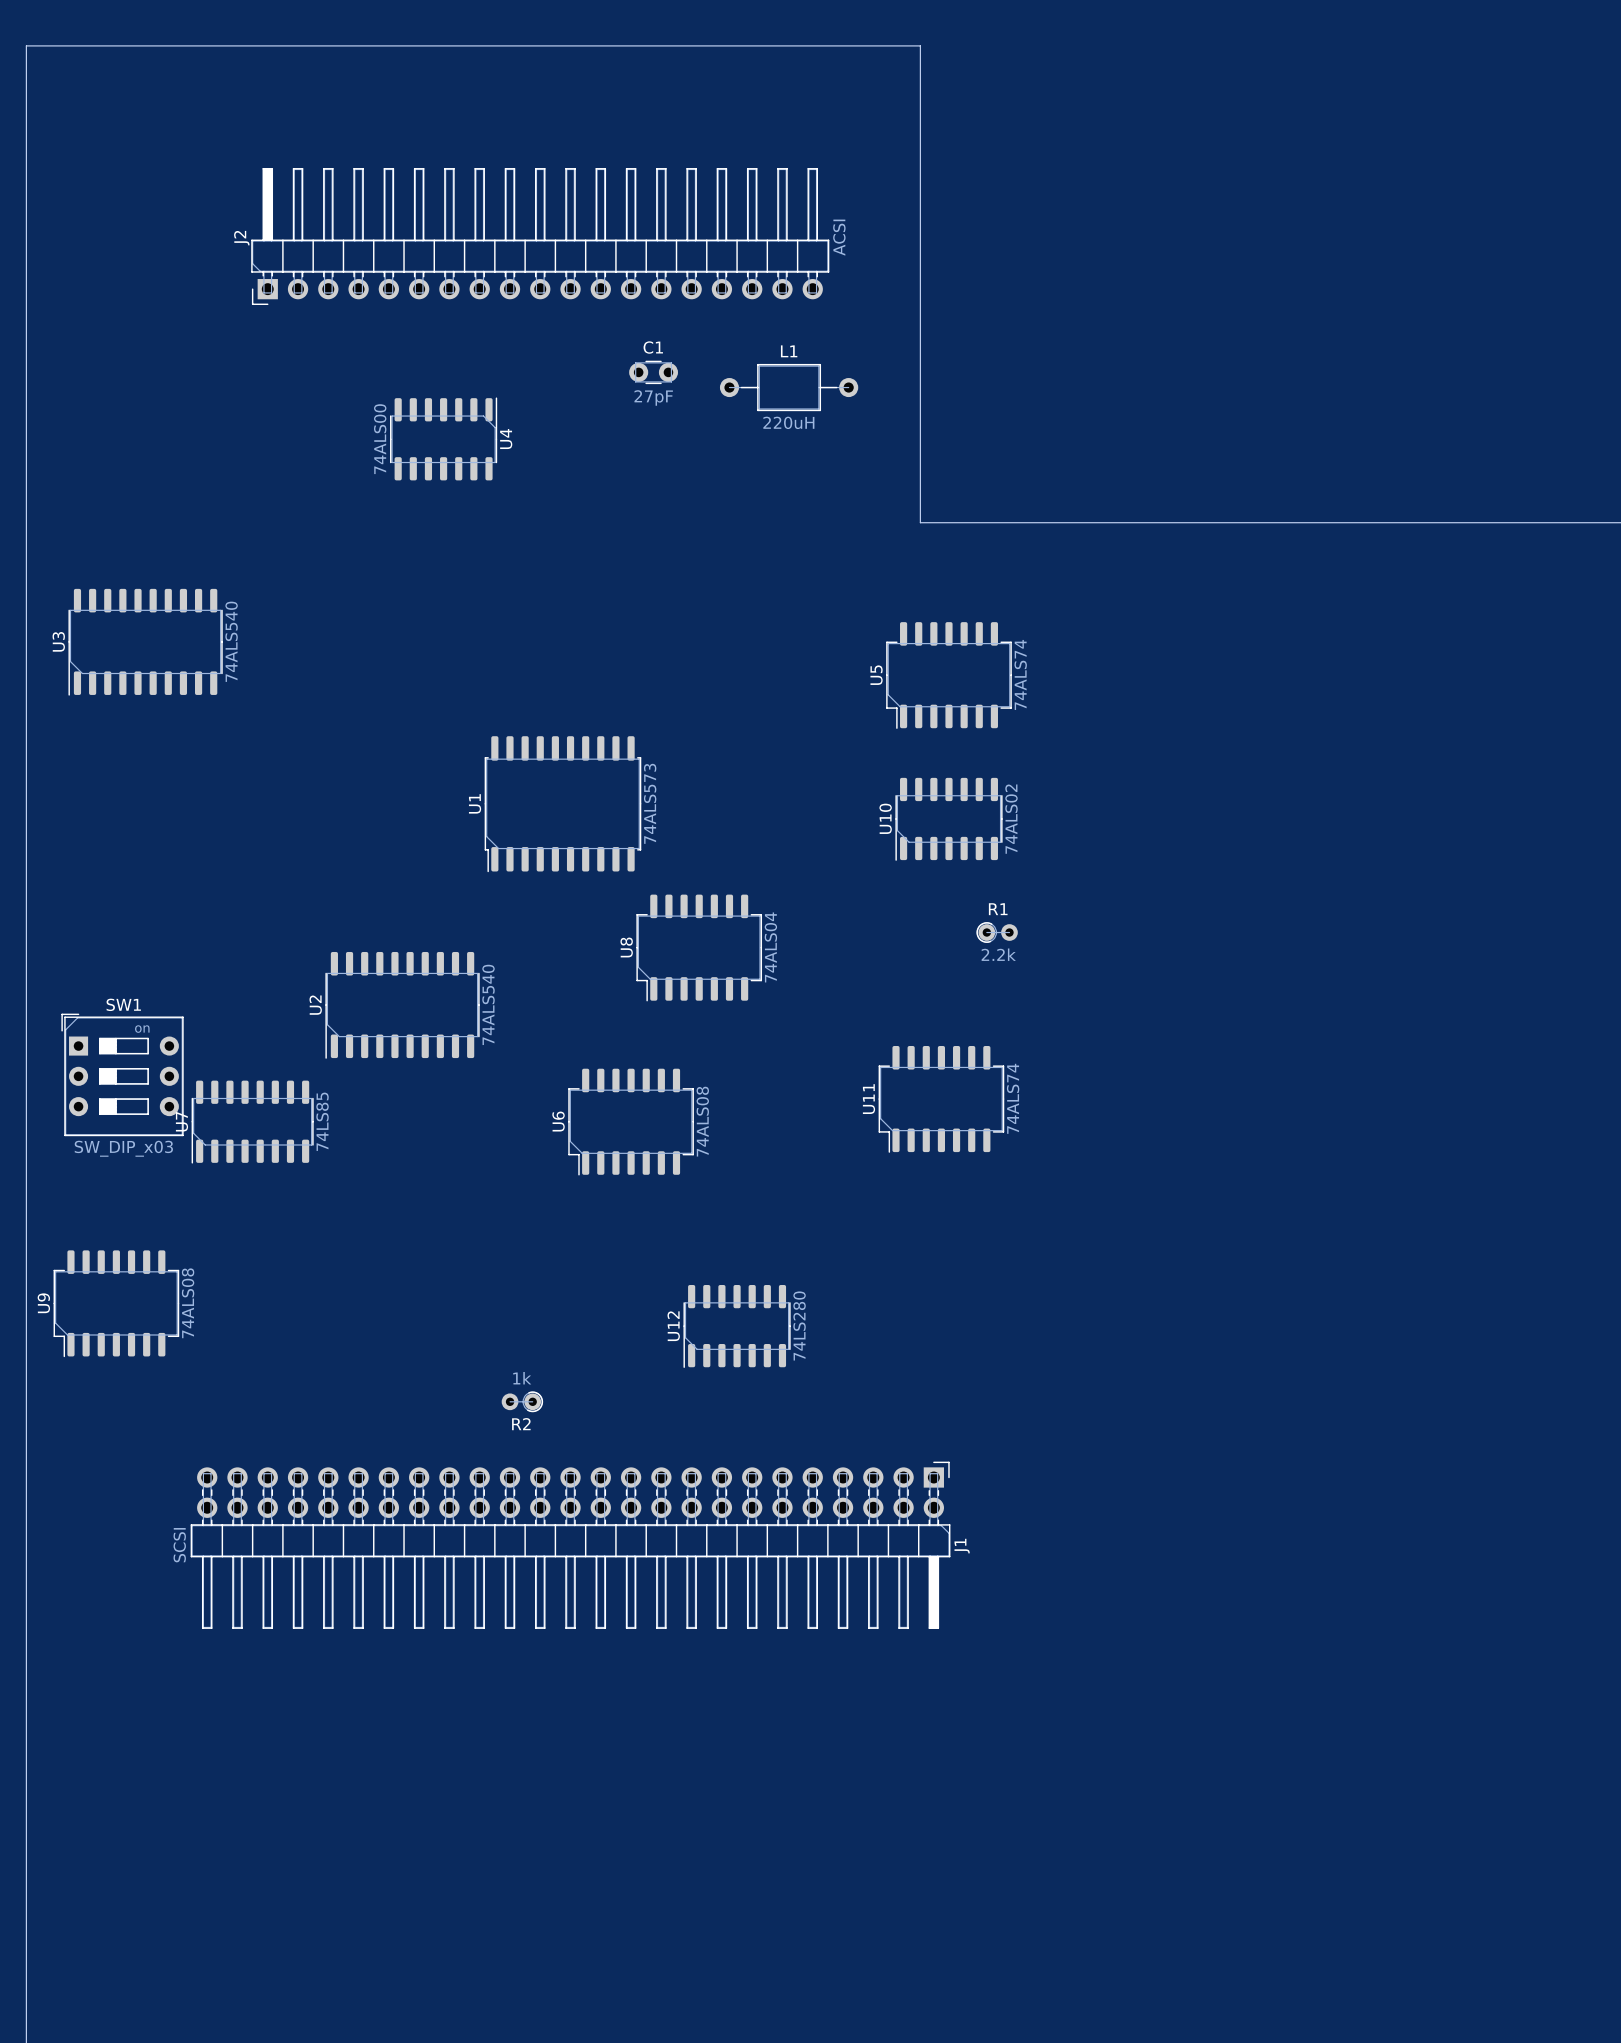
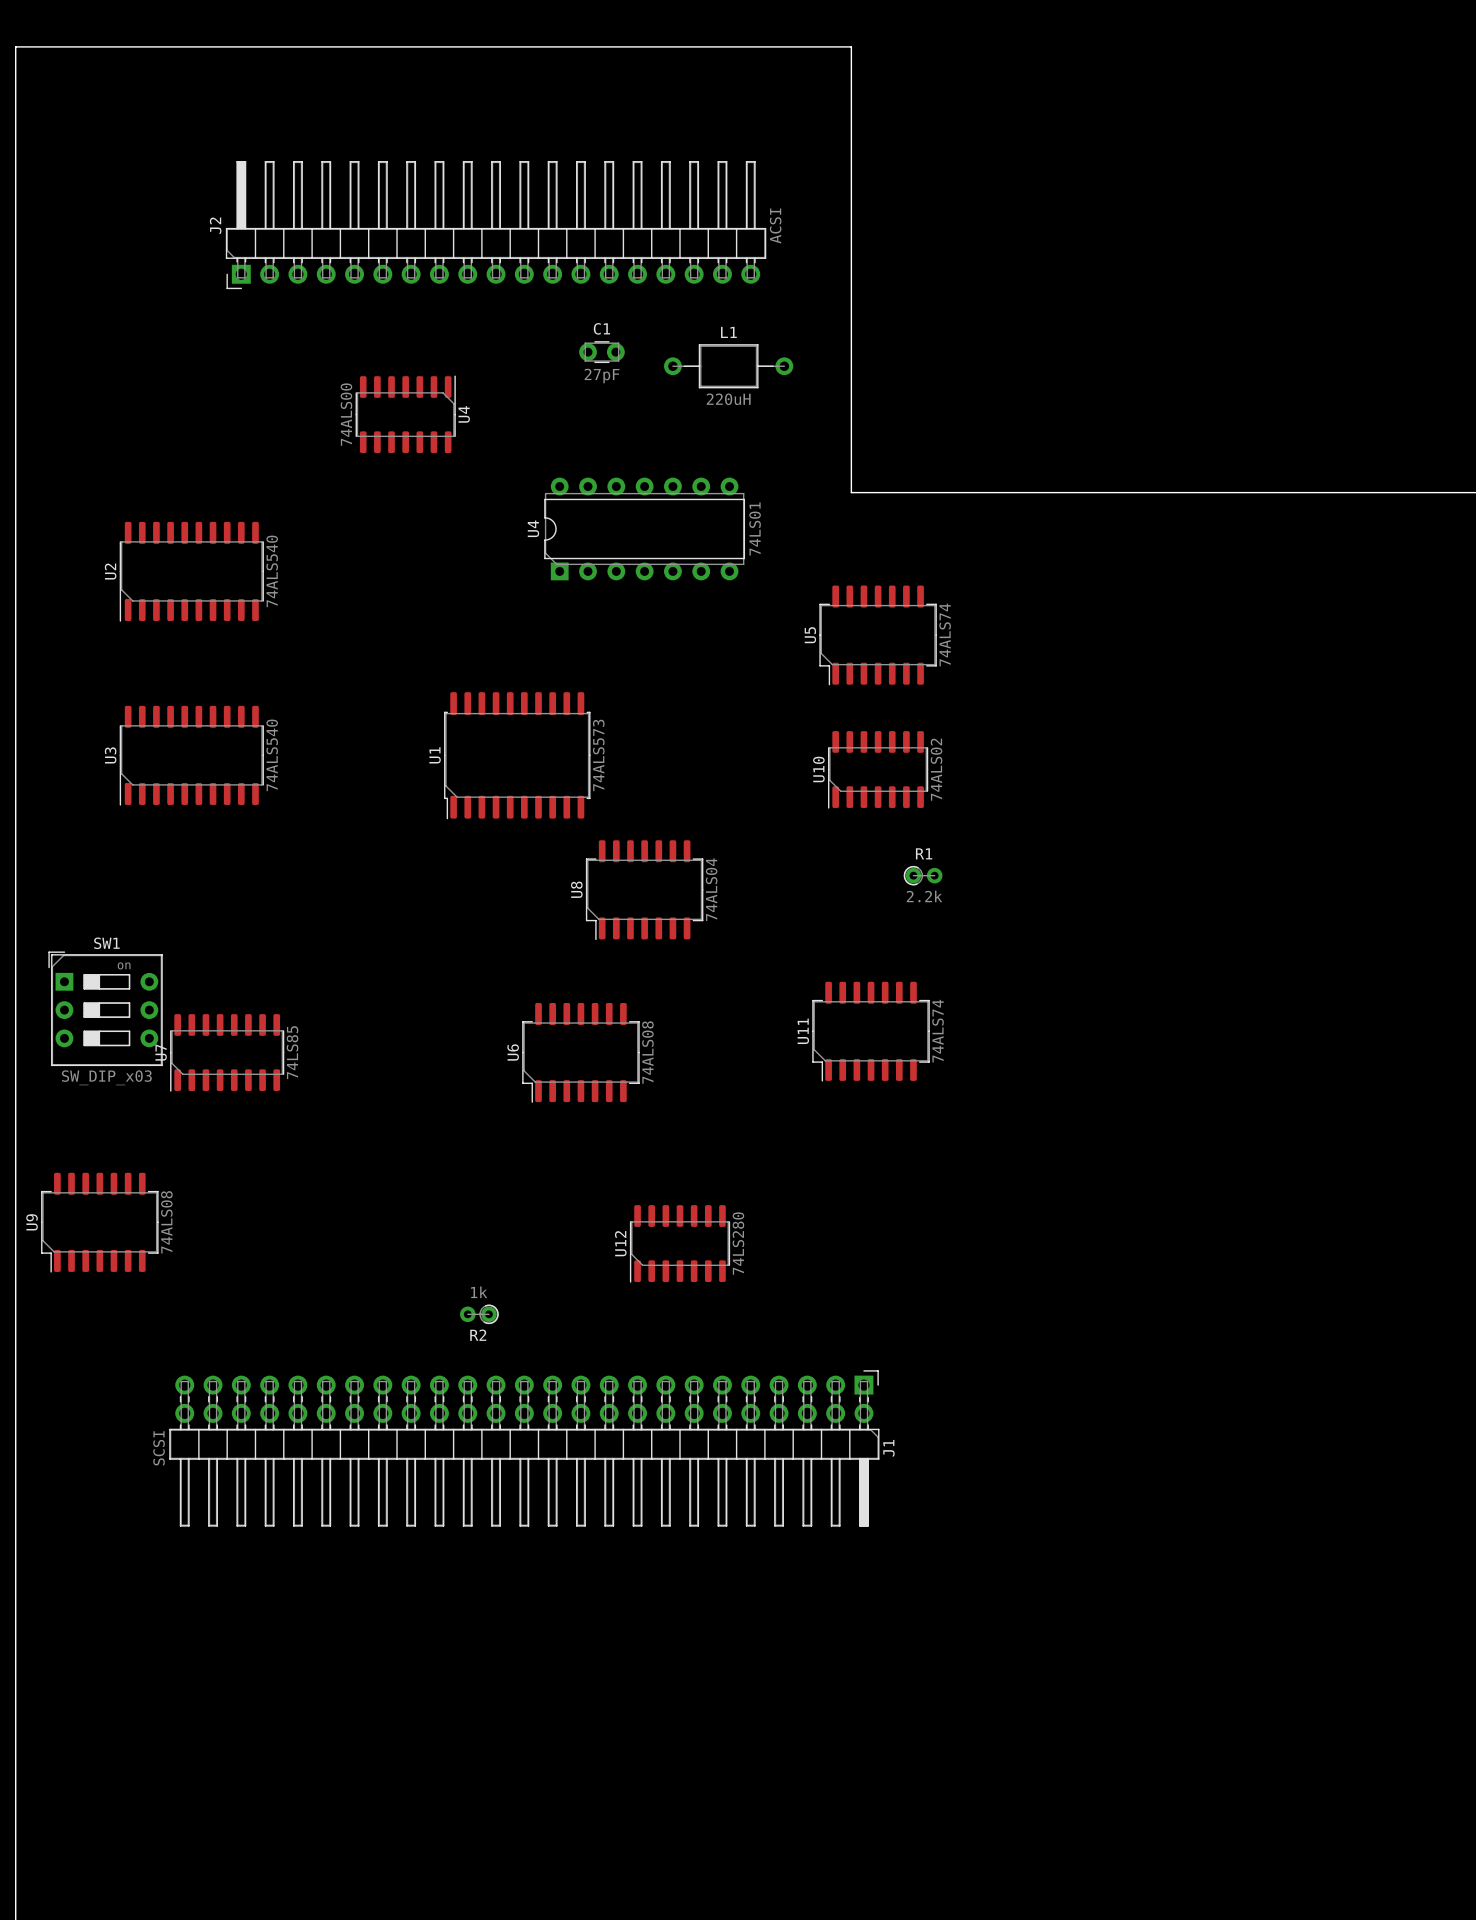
U4: none -> 74LS01 (644, 528)
U3 position: (145, 642) -> (191, 755)
U2 position: (402, 1005) -> (191, 571)

